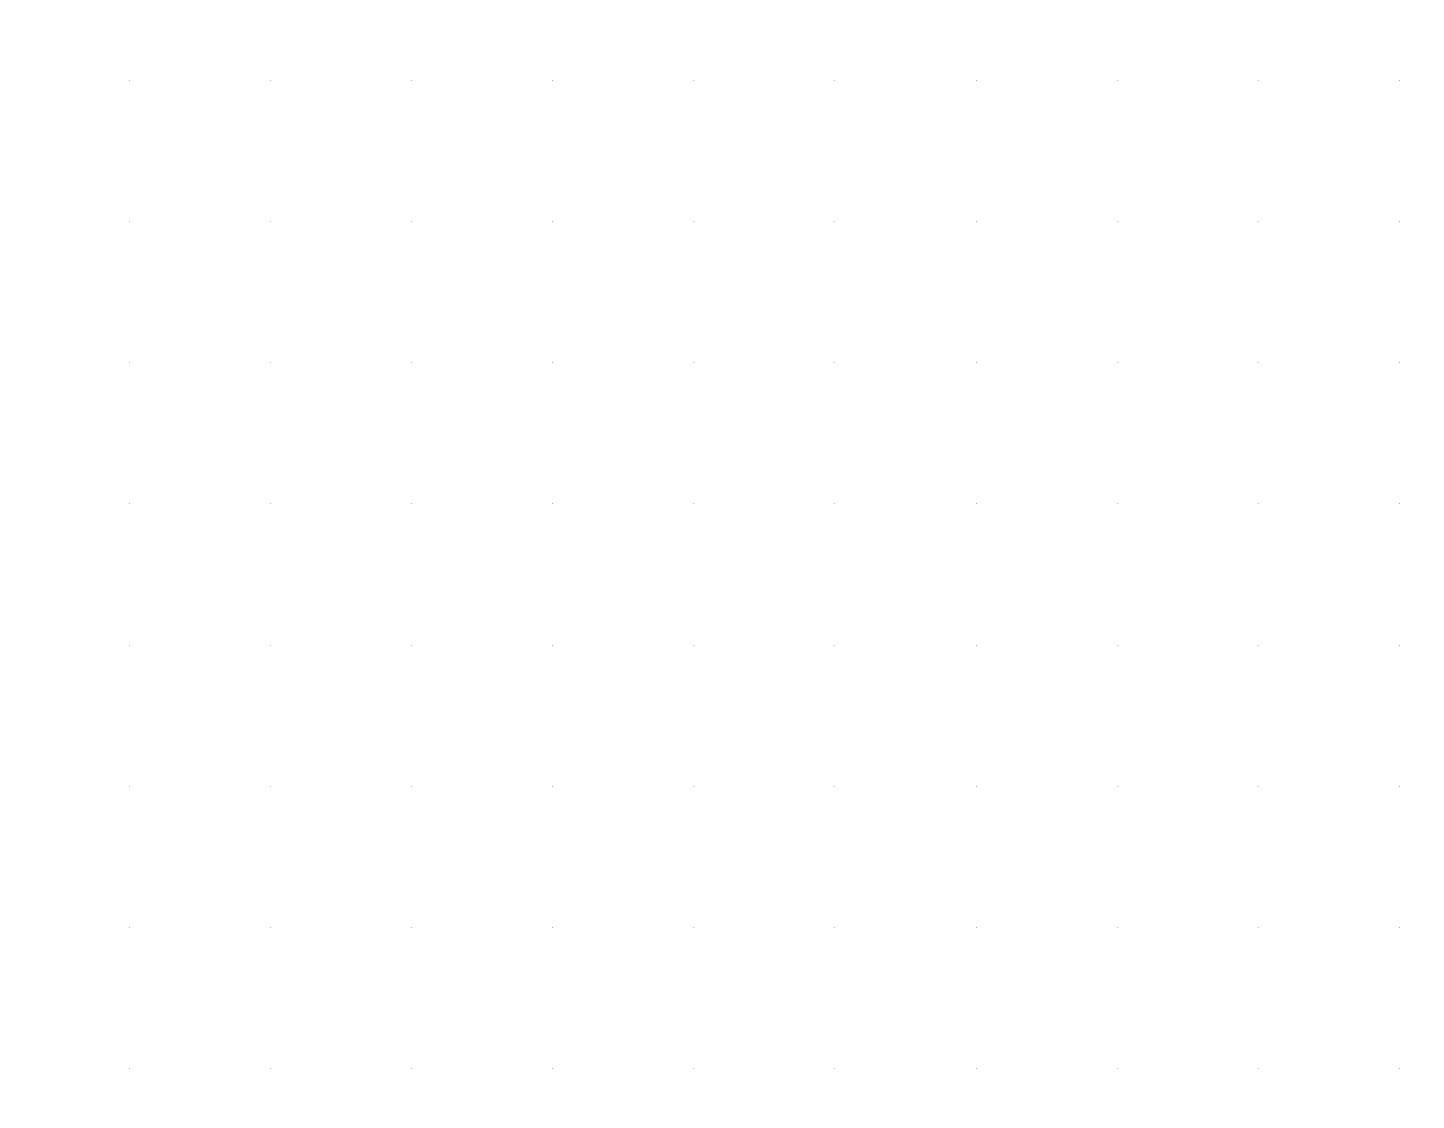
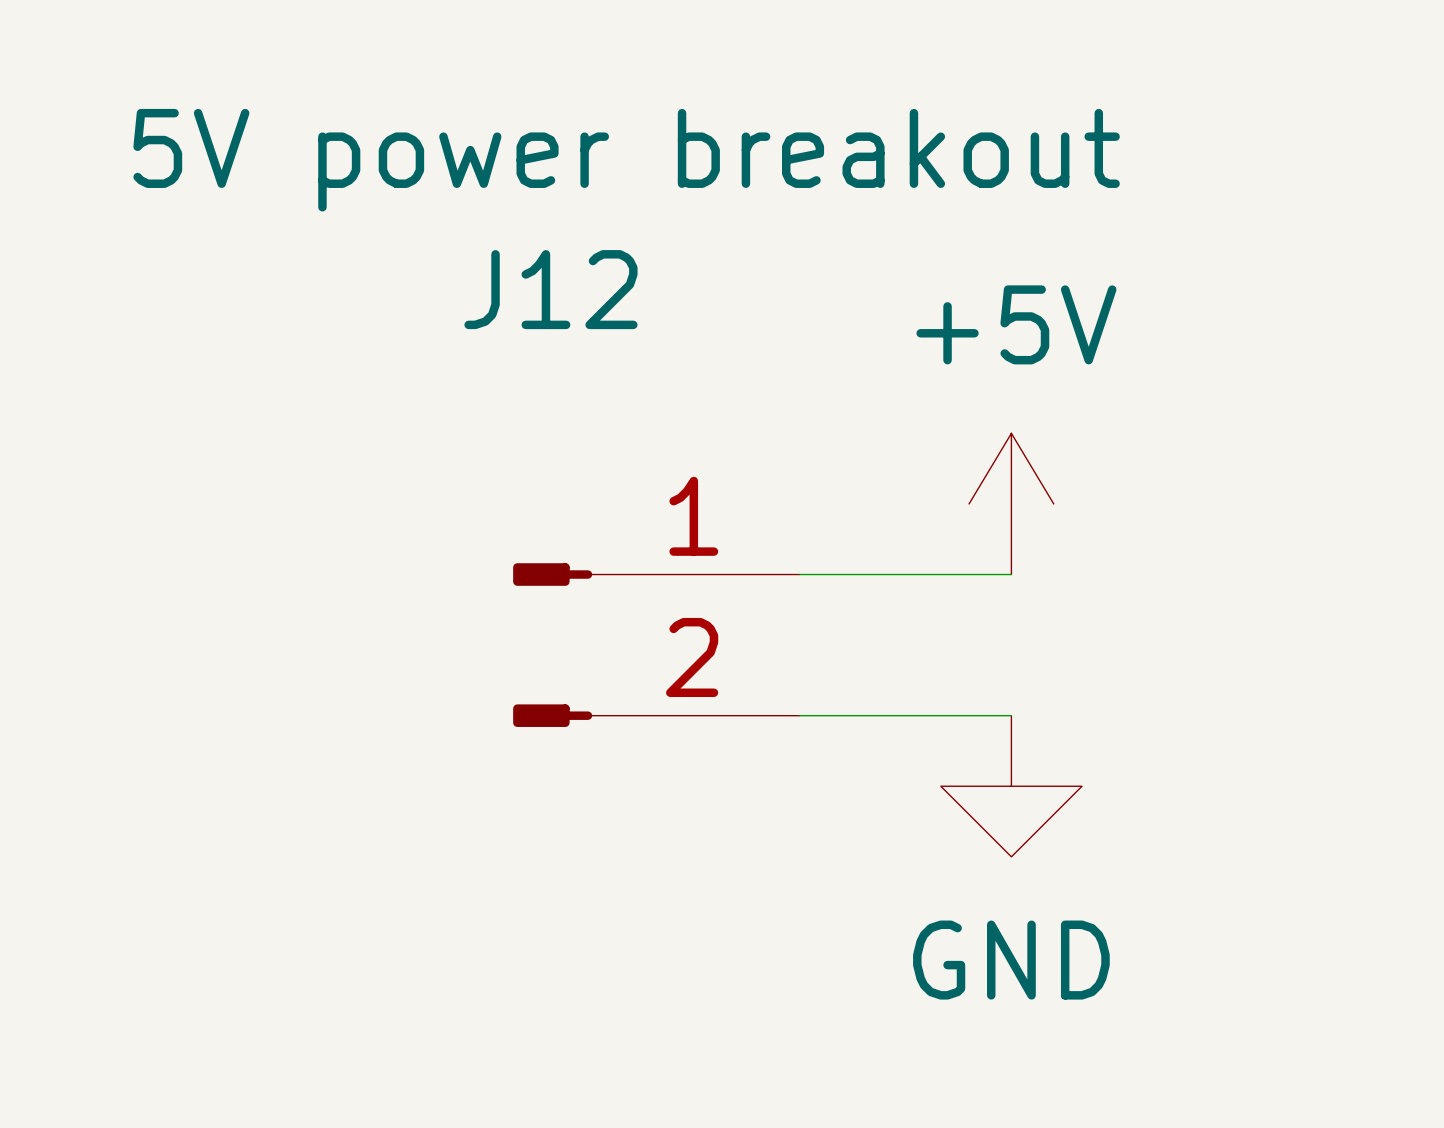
power symbol: none -> +5V (1011, 503)
wire: none -> (799, 574) (1011, 574)
J12: none -> 5V power breakout (656, 645)
wire: none -> (799, 715) (1011, 715)
power symbol: none -> GND (1011, 786)

